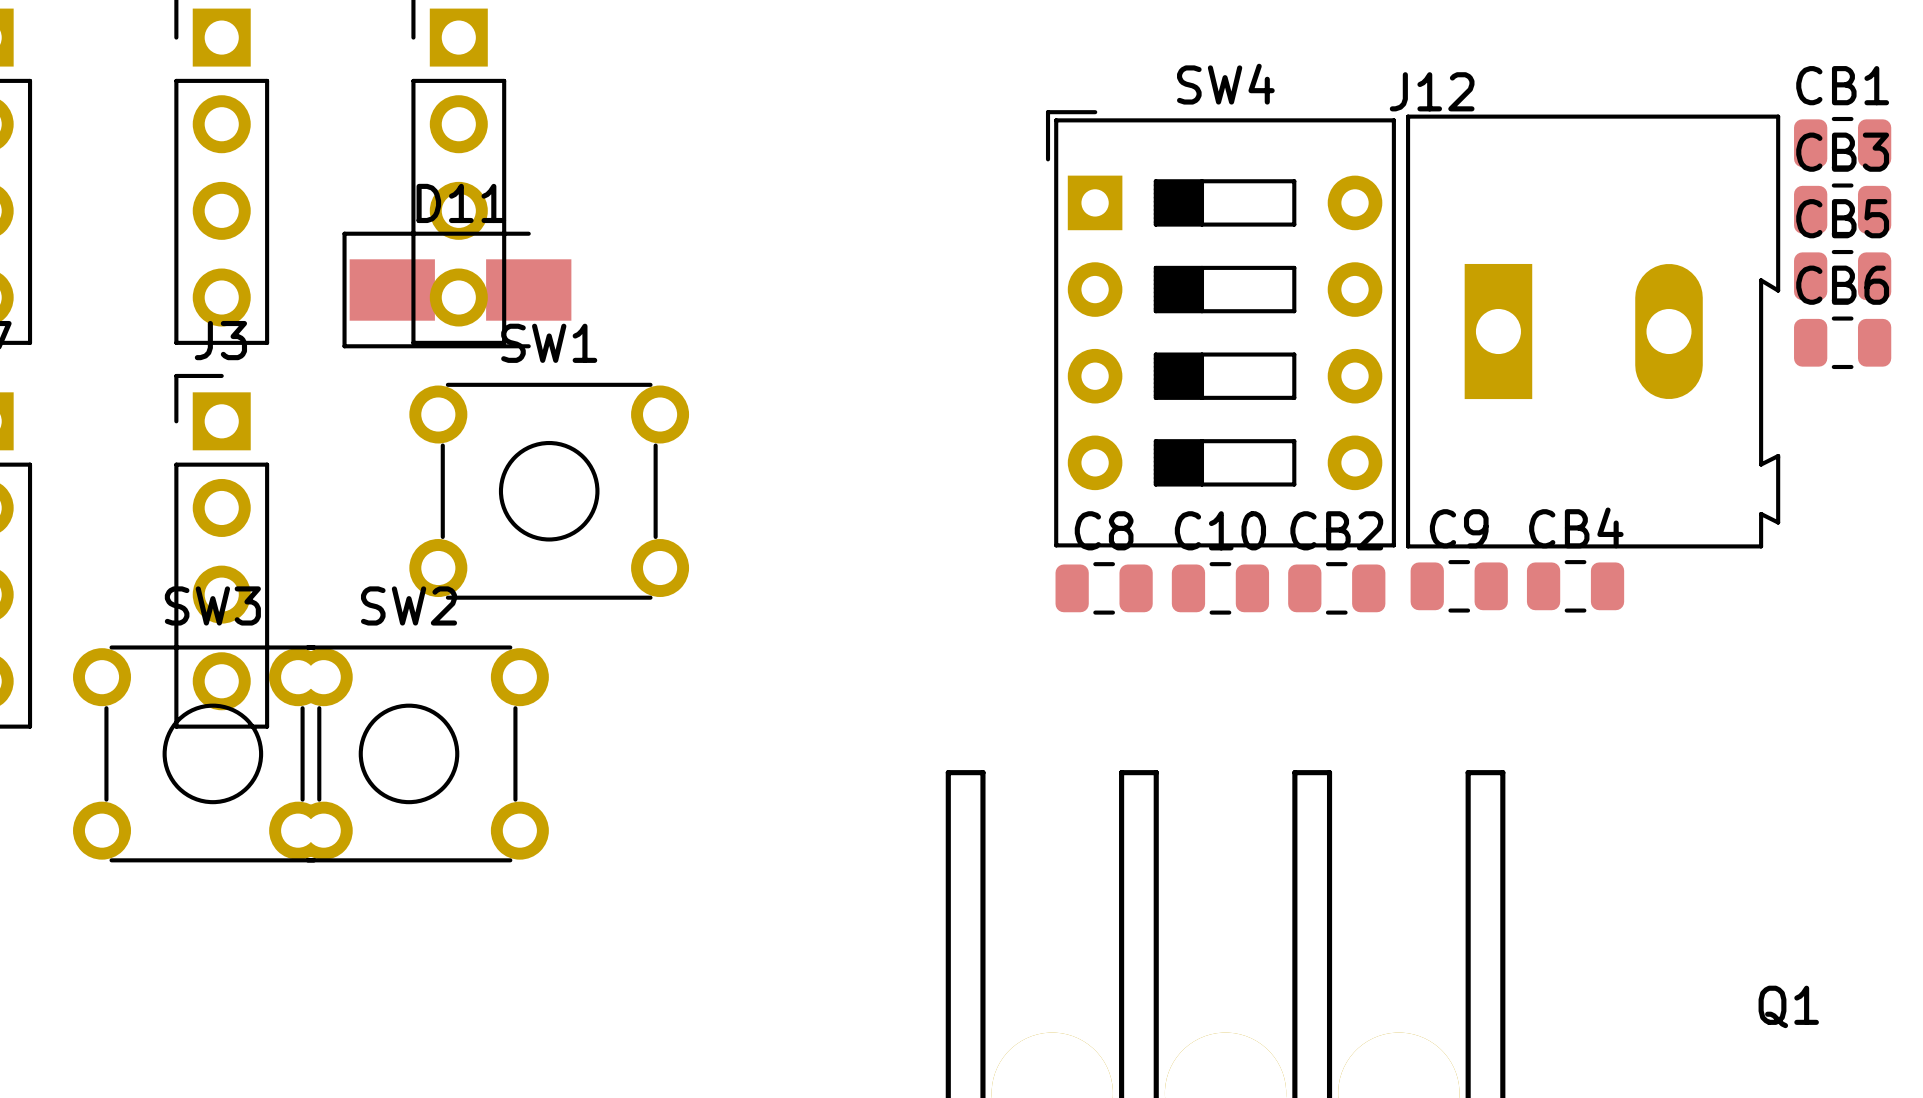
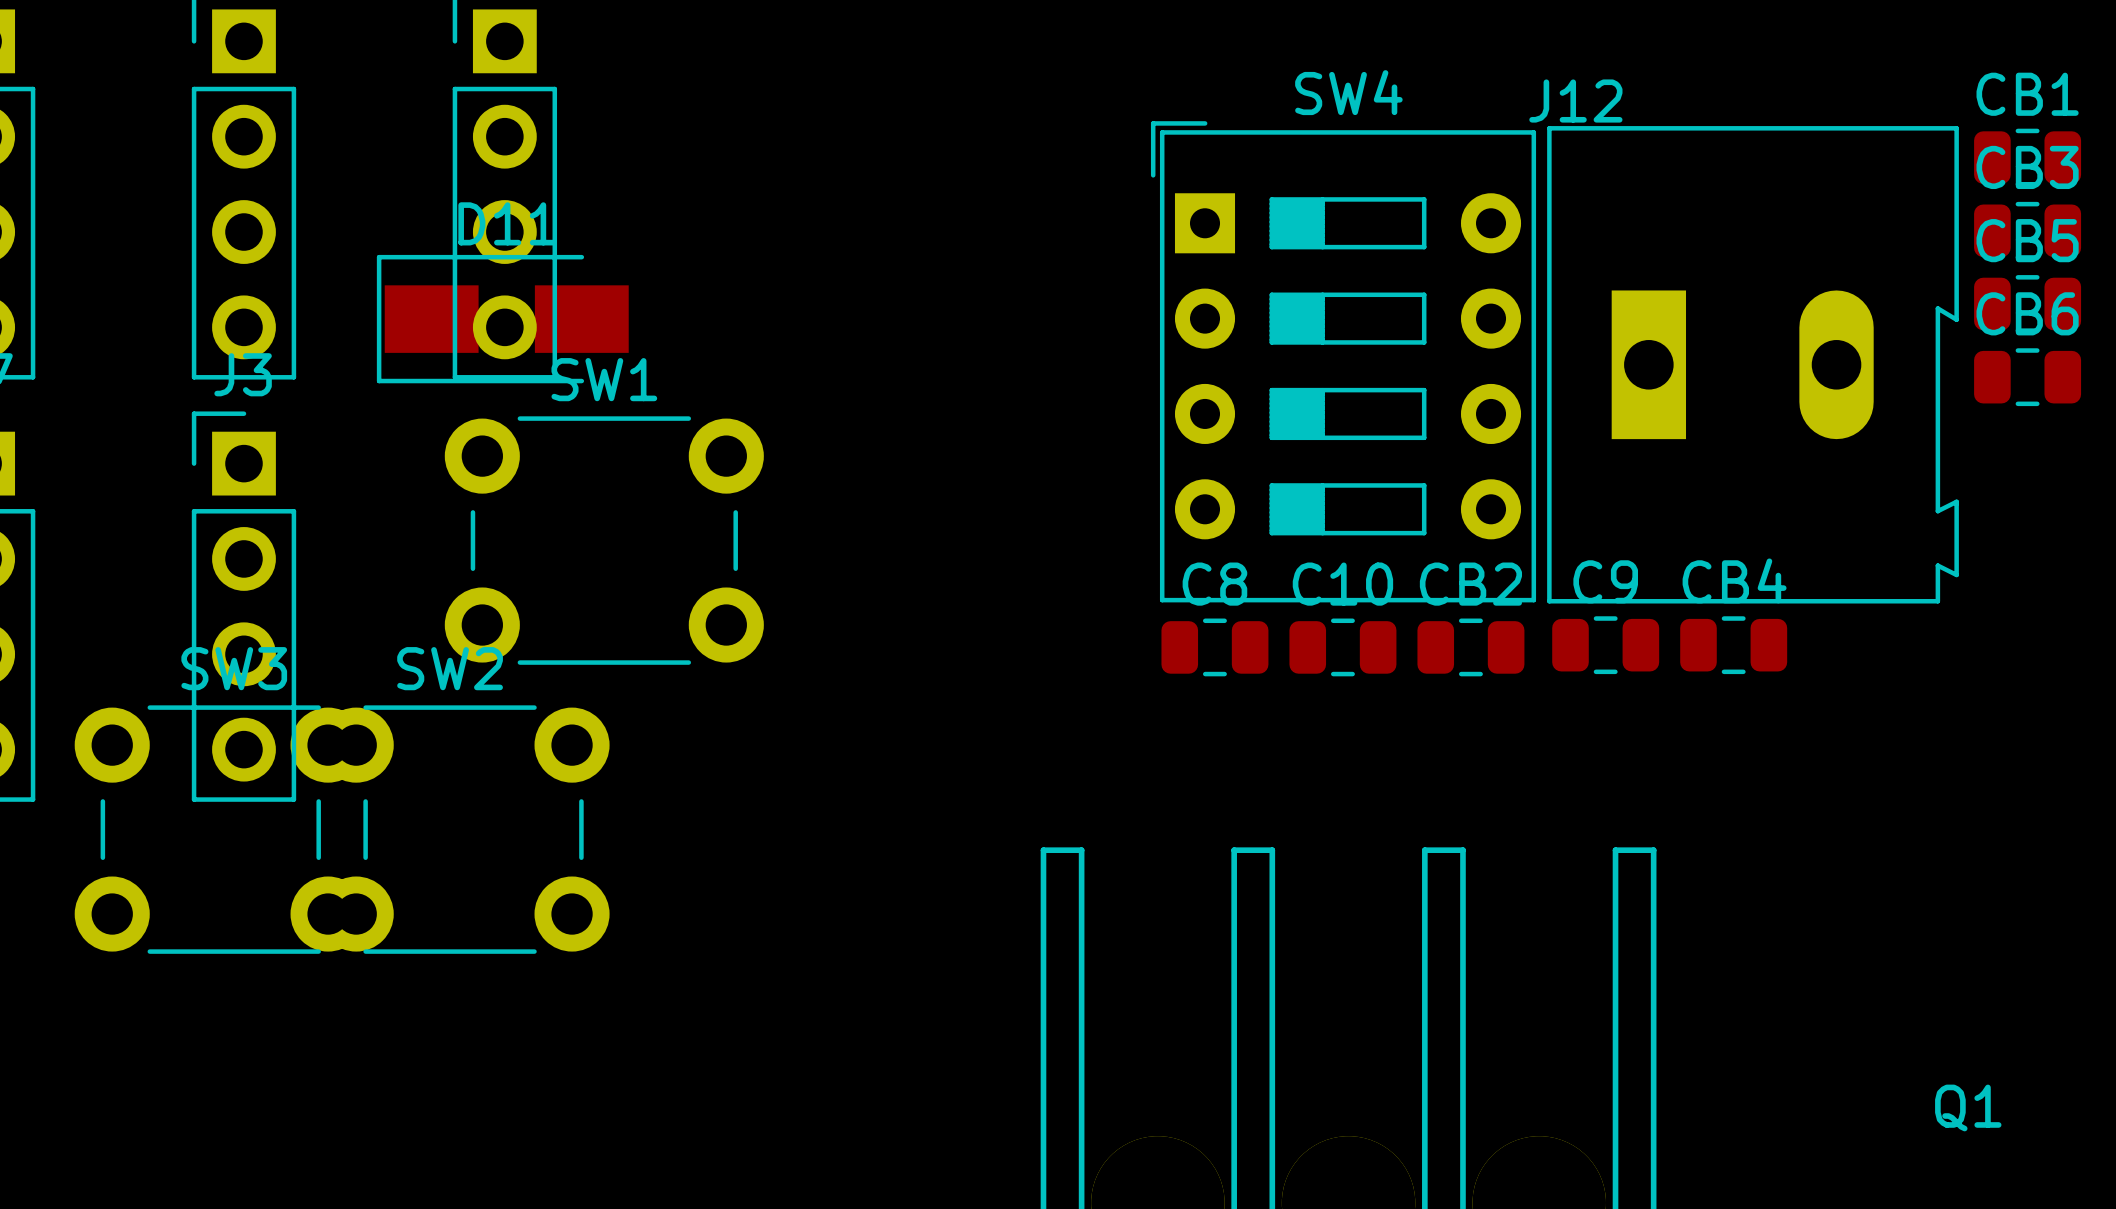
SW1 footprint: [409, 382, 690, 600] -> [444, 416, 764, 665]
SW3 footprint: [73, 645, 353, 863] -> [74, 705, 394, 954]
SW2 footprint: [269, 645, 549, 863] -> [290, 705, 610, 954]

